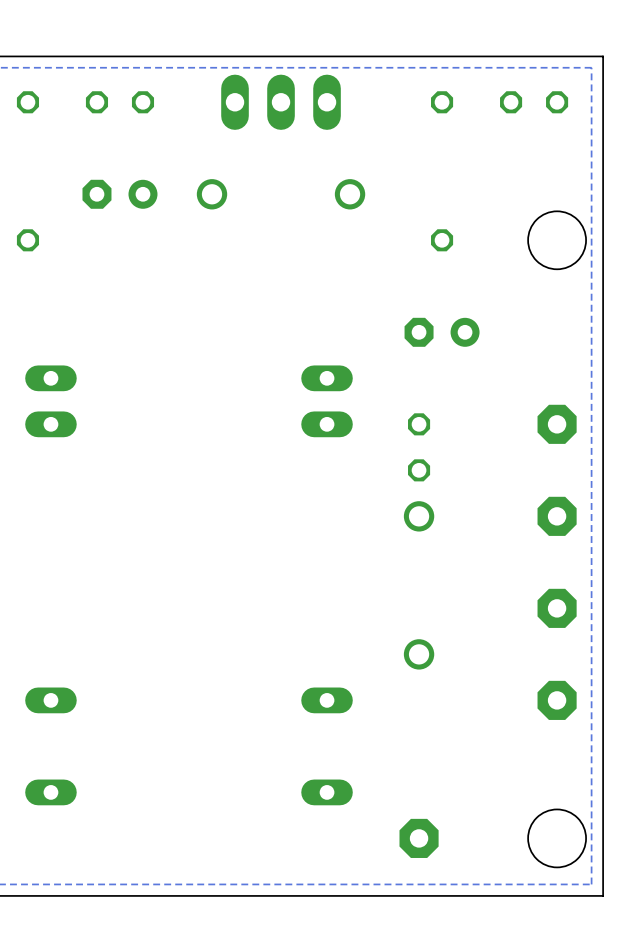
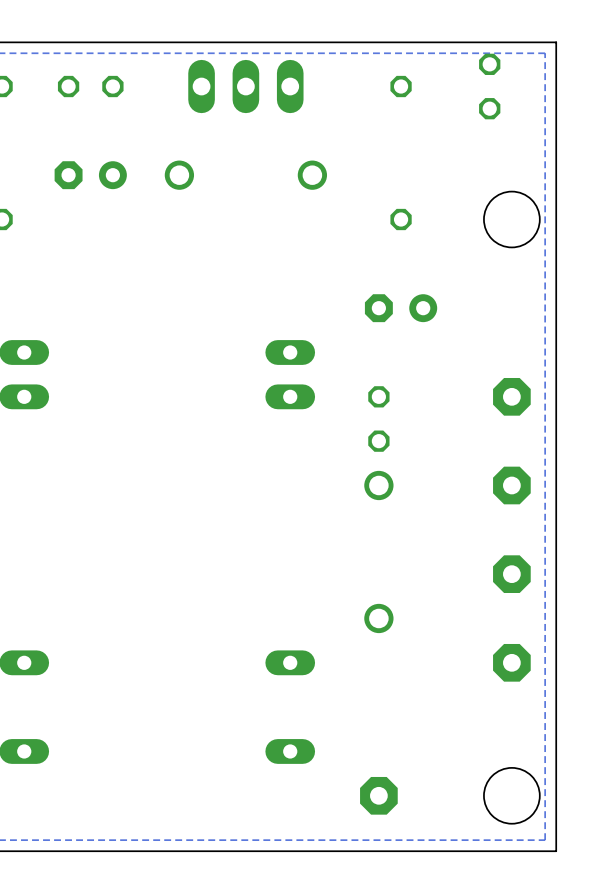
part rotation: 0° (534, 102) -> 90° clockwise (489, 86)

